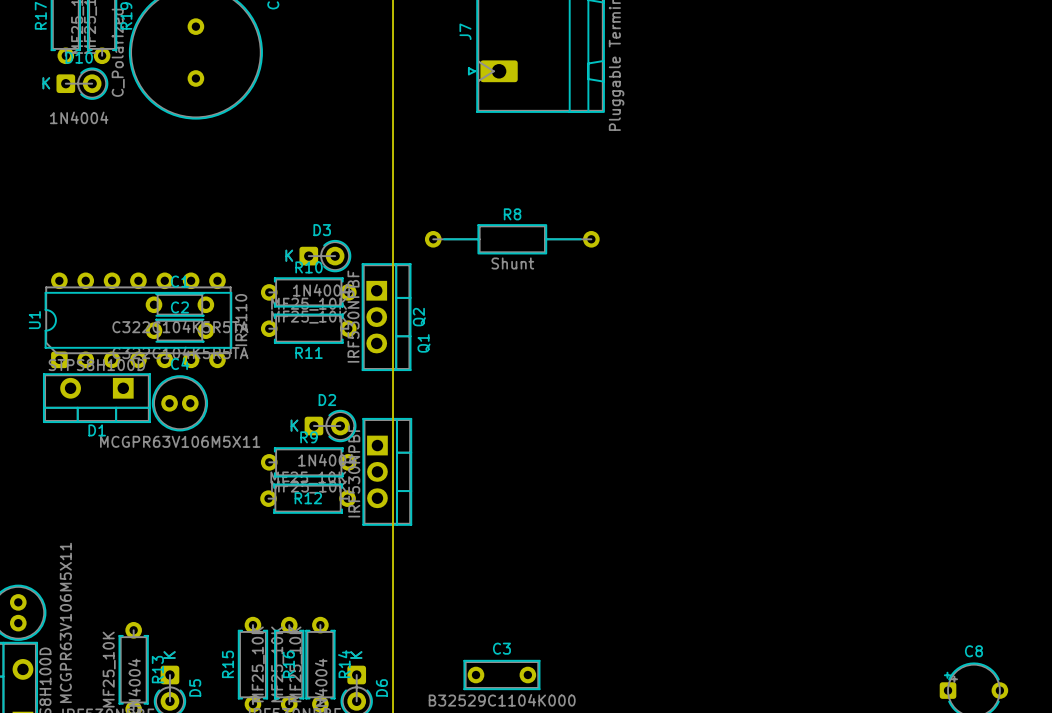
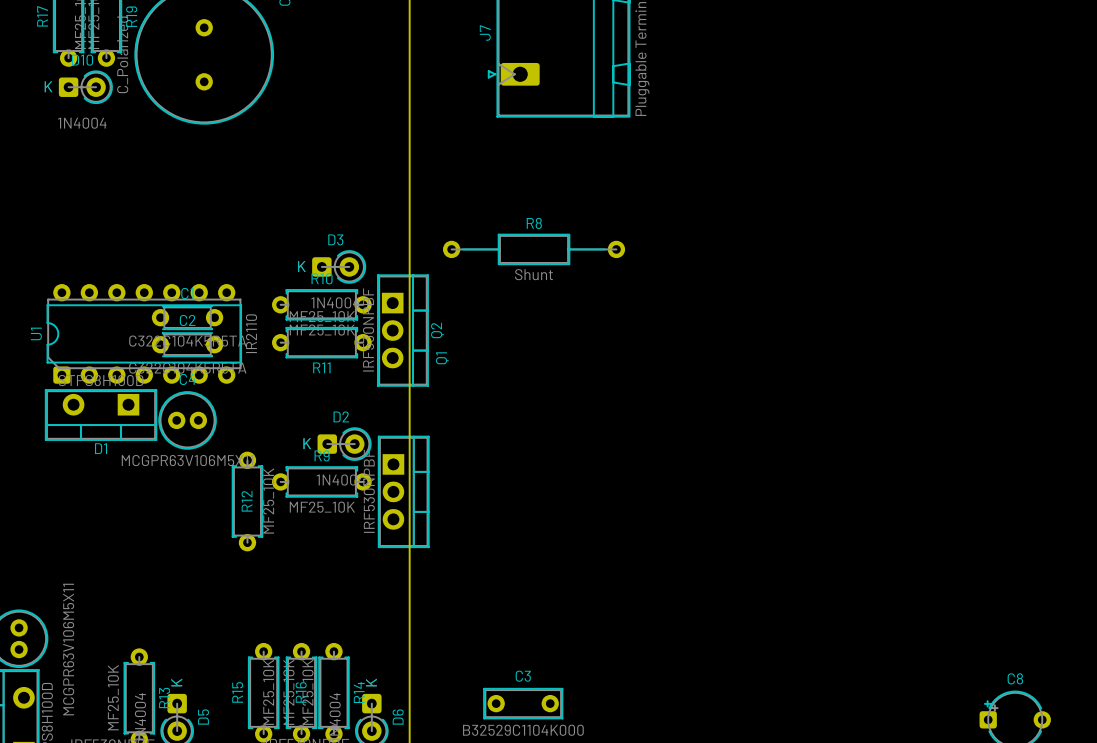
R12 rotation: 0° (308, 498) -> 90° clockwise (247, 501)
R12 position: (308, 498) -> (247, 501)

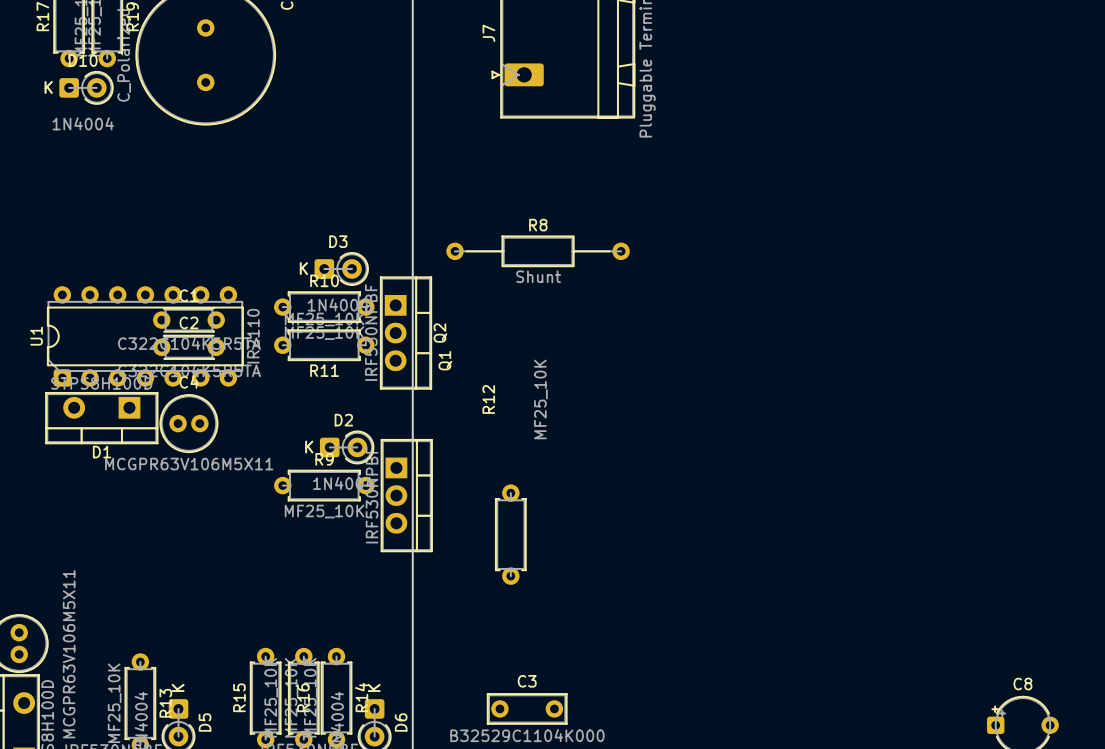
R12 value position: MF25_10K (268, 500) -> MF25_10K (540, 399)
R12 position: (247, 501) -> (510, 534)
R12 name position: R12 (247, 501) -> R12 (488, 399)

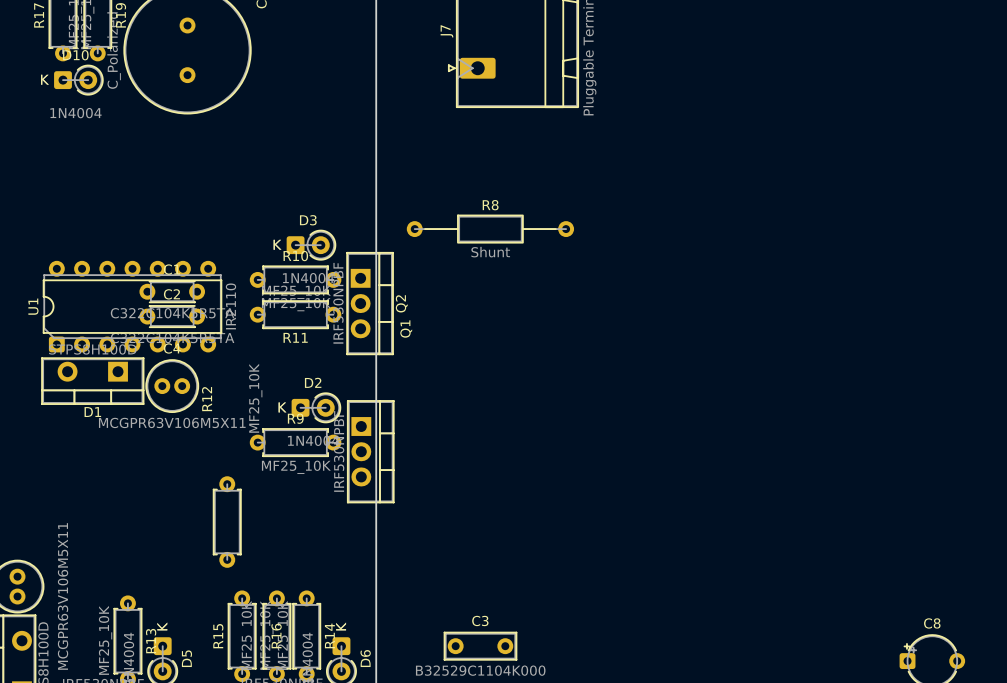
R12 position: (510, 534) -> (227, 522)

